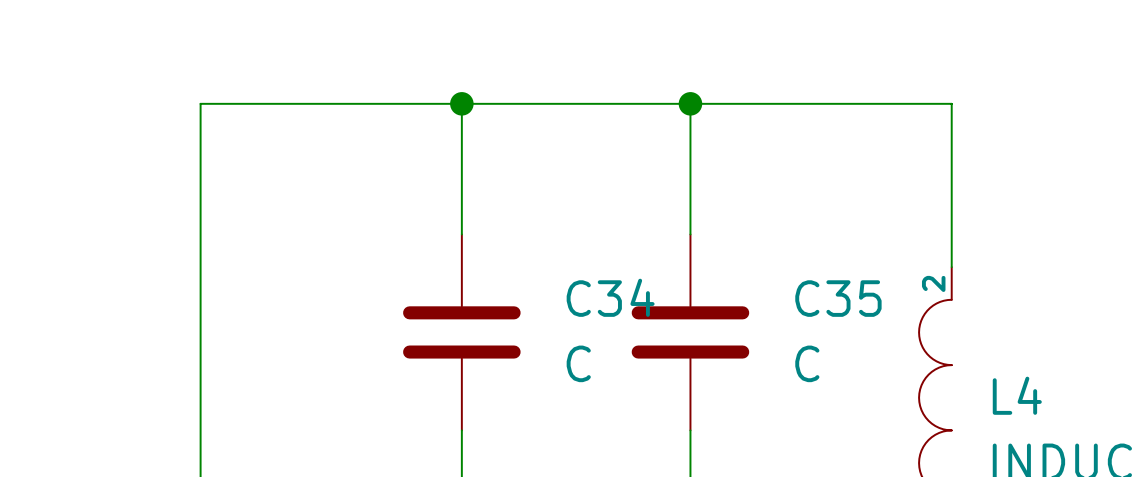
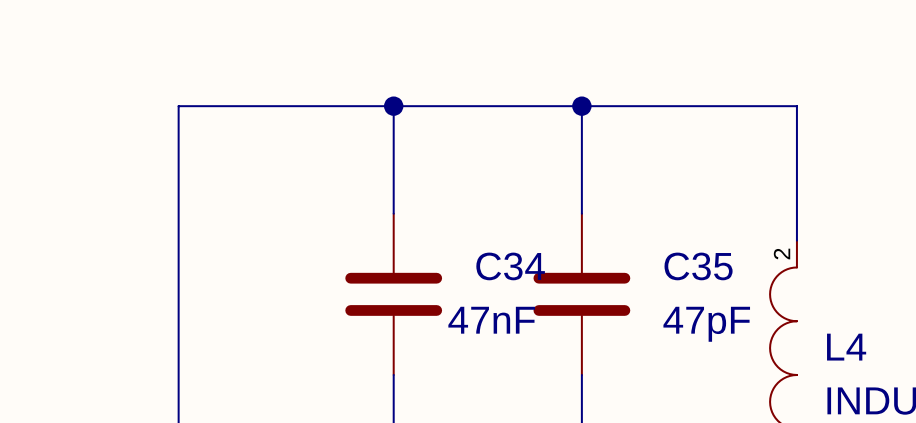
C34 value: C (578, 363) -> 47nF (491, 320)
C35 value: C (807, 363) -> 47pF (706, 324)

